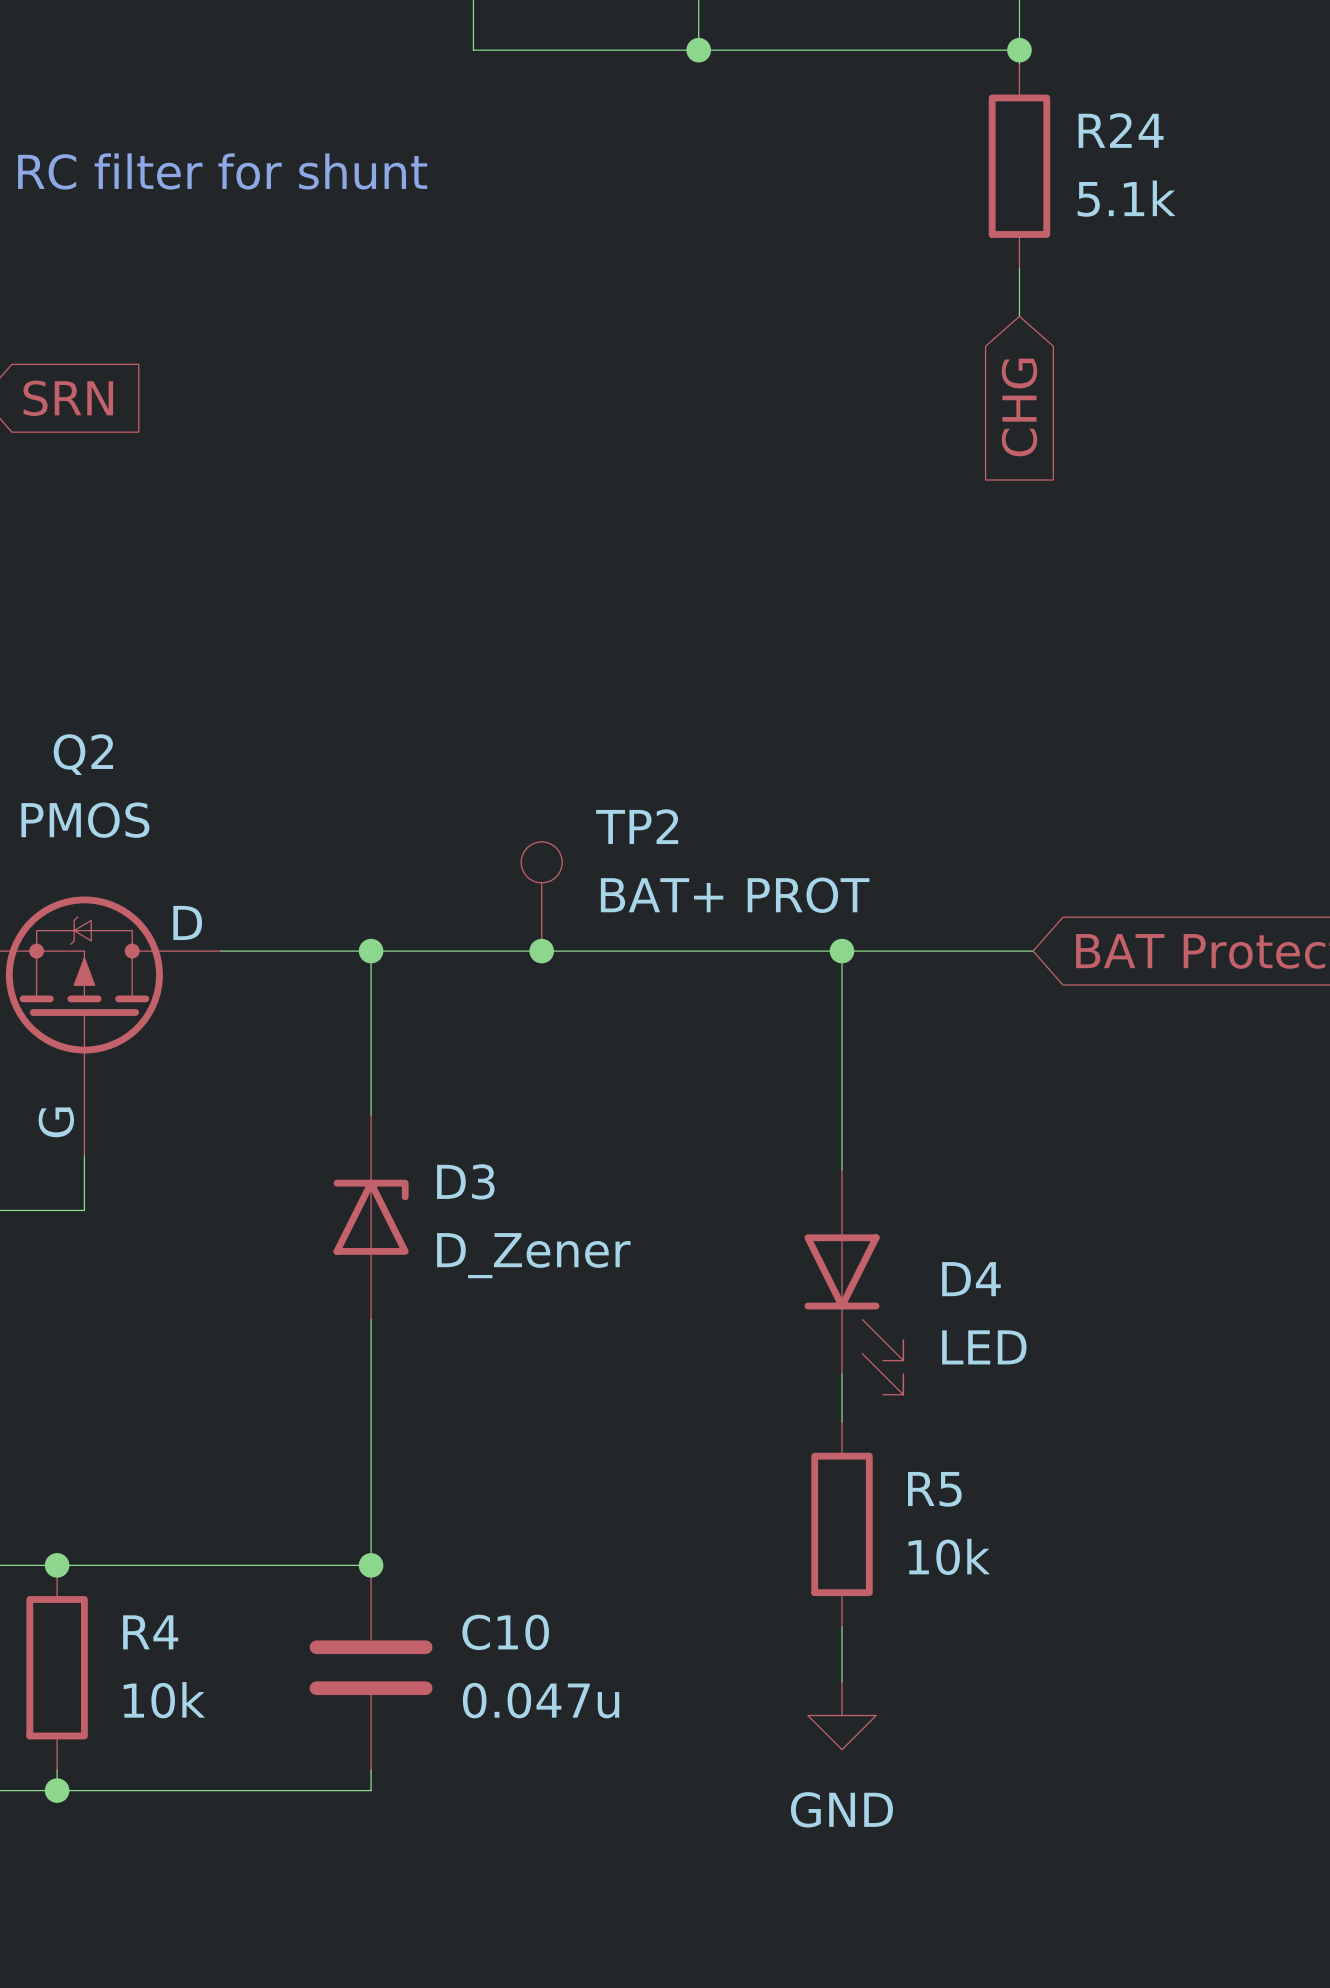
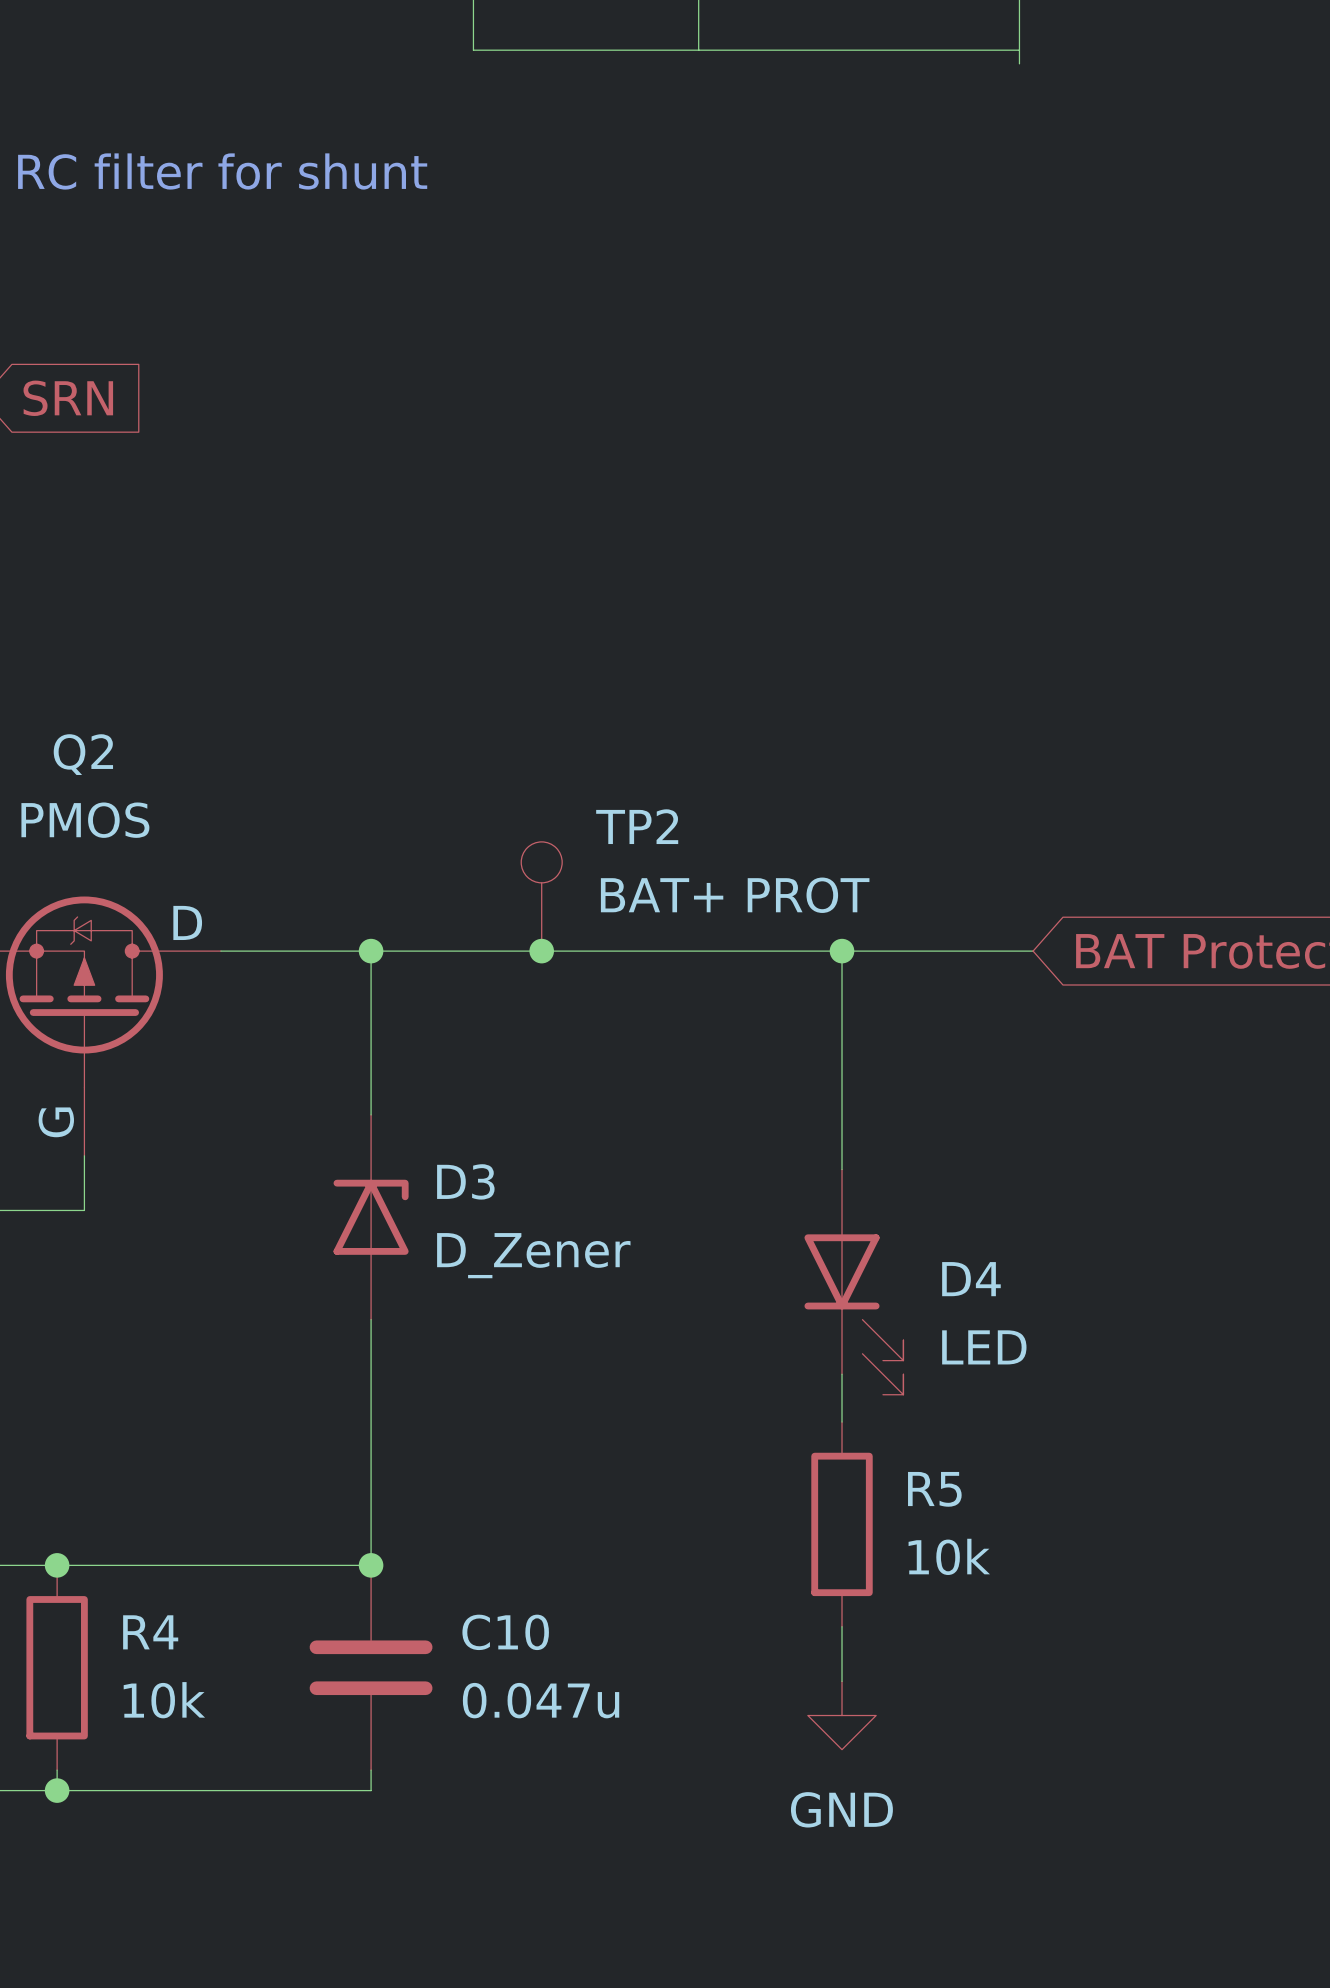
junction: (698, 50) -> none
junction: (1019, 50) -> none
R24: 5.1k (1019, 166) -> none
wire: (1019, 268) (1019, 316) -> none
global label: CHG (1019, 407) -> none

